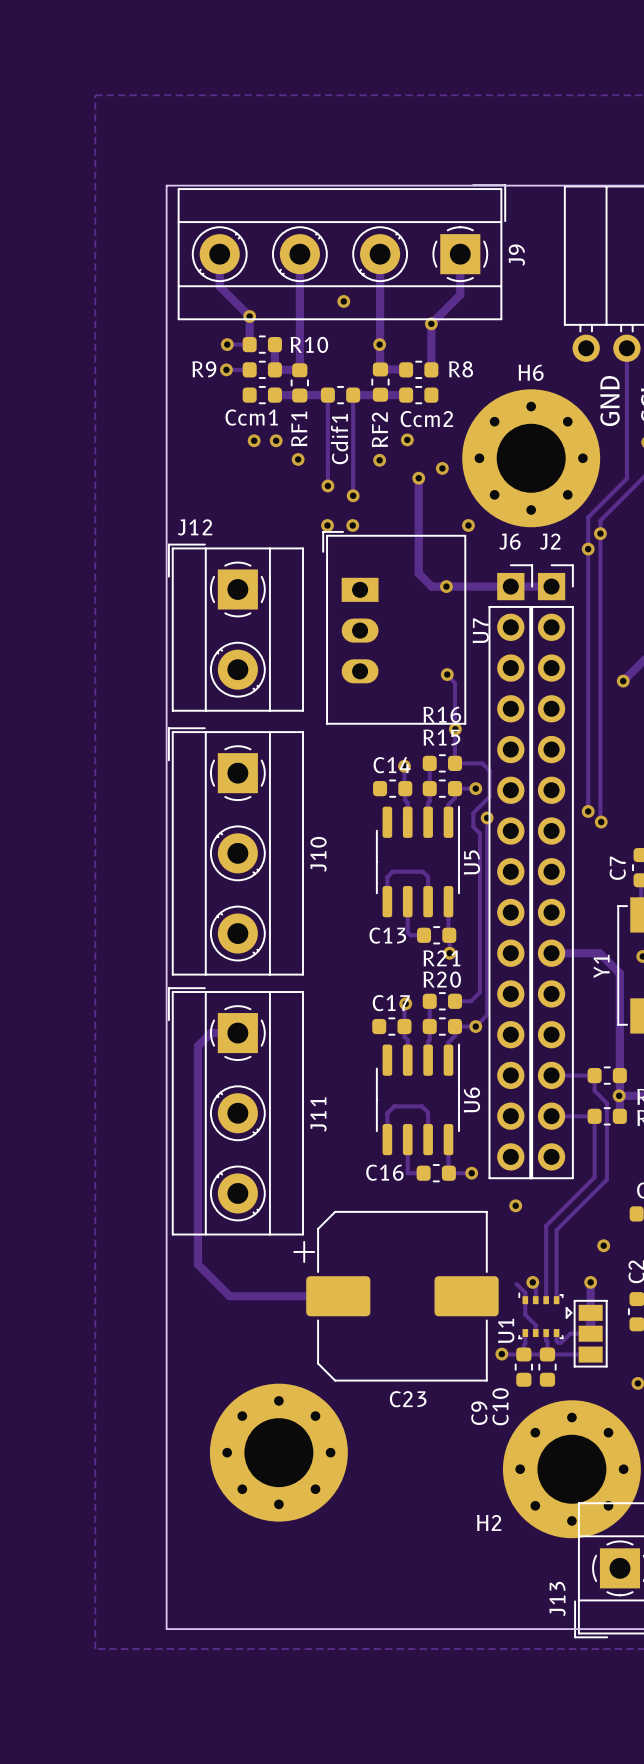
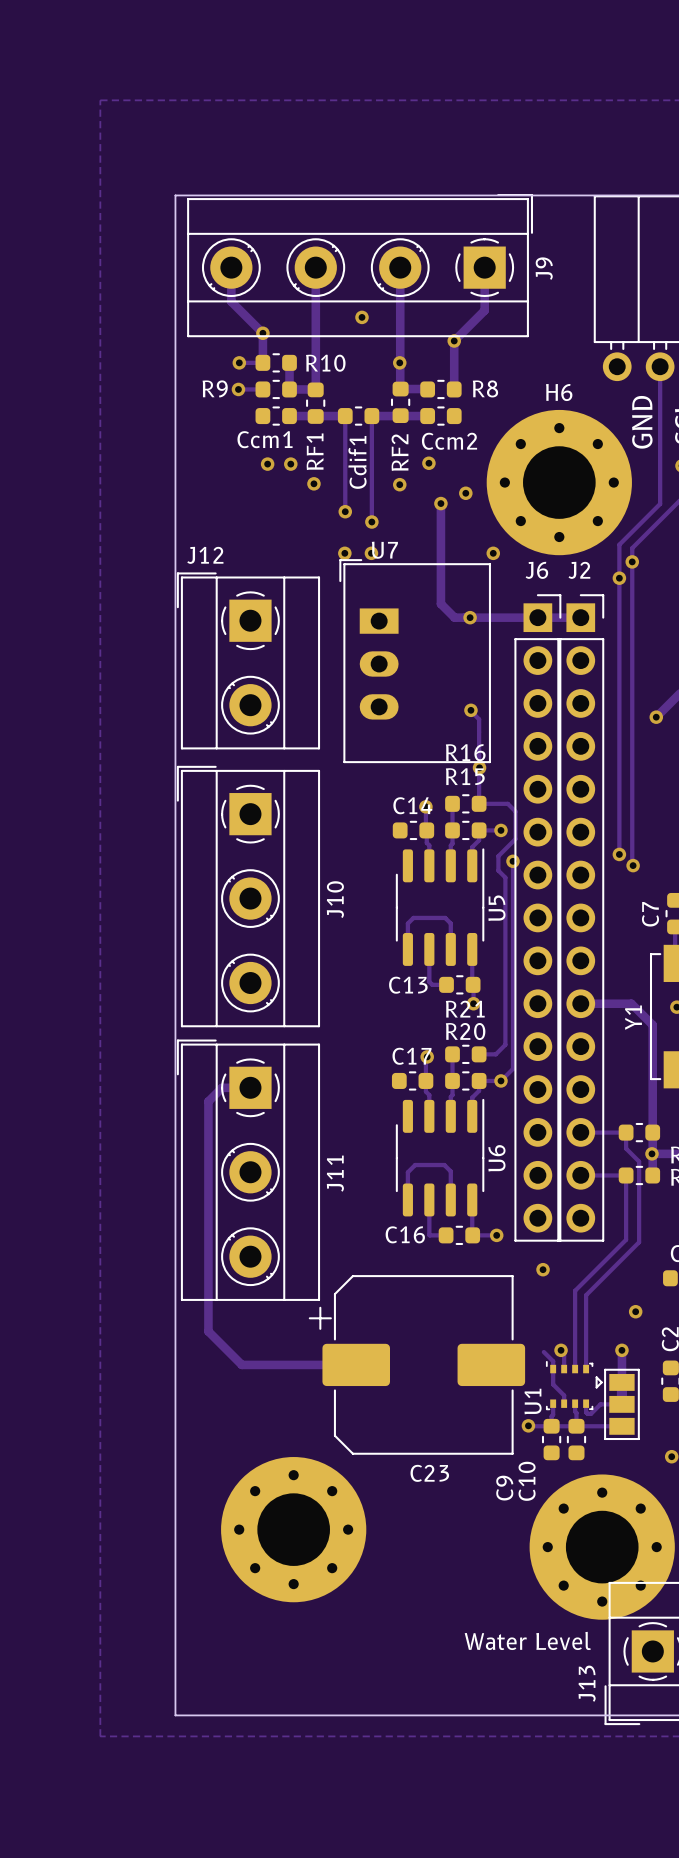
U7 name rotation: 0° (480, 630) -> 90° clockwise (384, 550)
U7 name position: U7 (480, 630) -> U7 (384, 550)
H2 name: H2 (489, 1522) -> none
text: none -> Water Level (527, 1640)

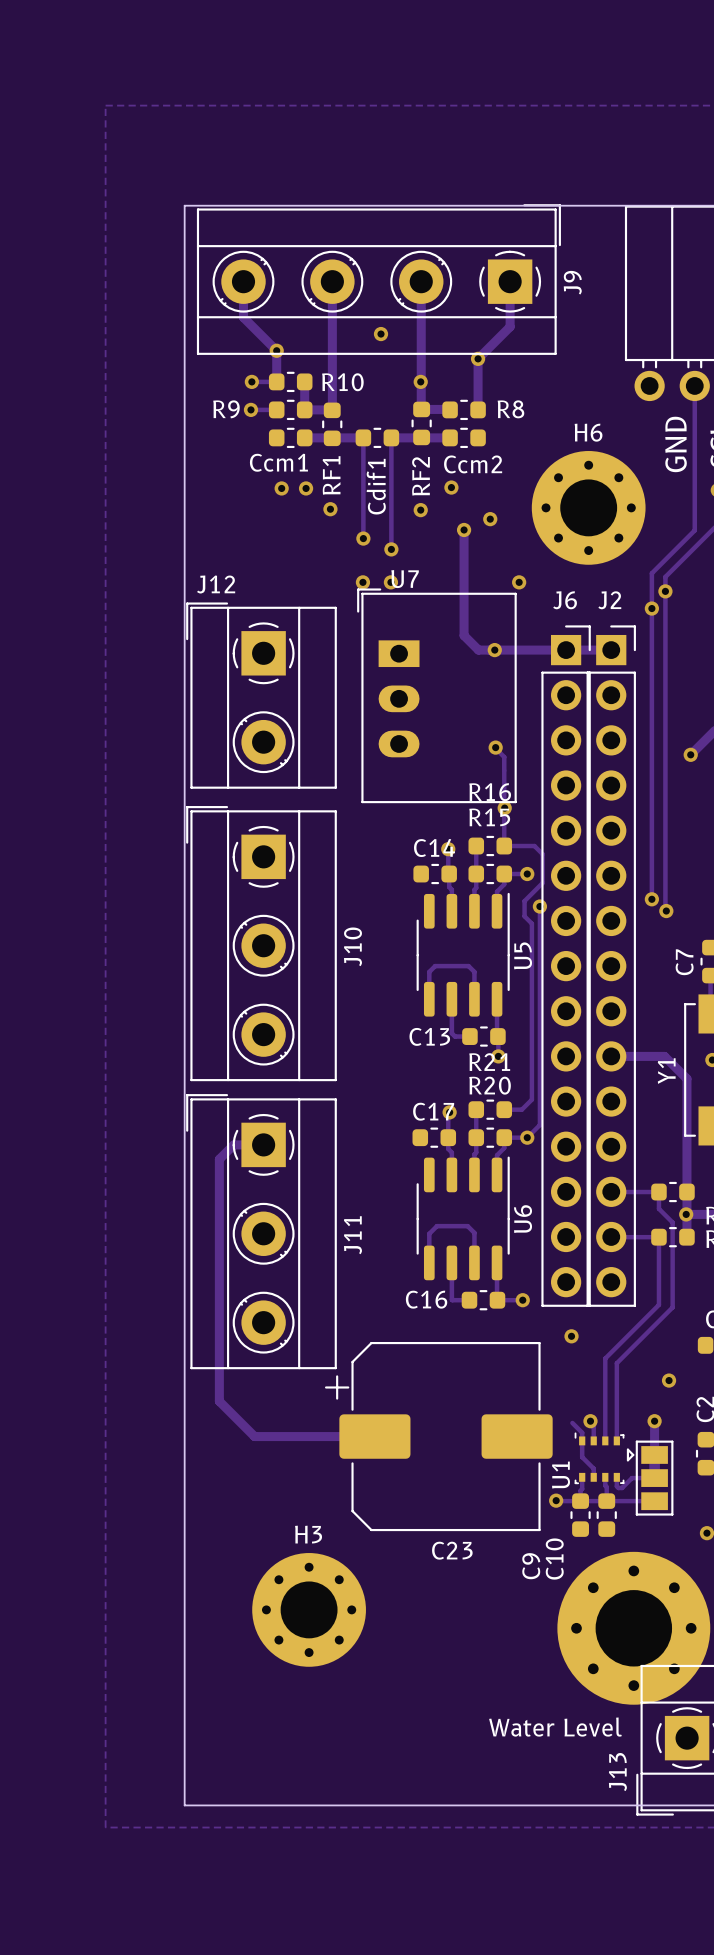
H6 footprint: [486, 409, 632, 556] -> [531, 451, 646, 565]
part: (293, 1529) -> none
H3: none -> (309, 1609)

